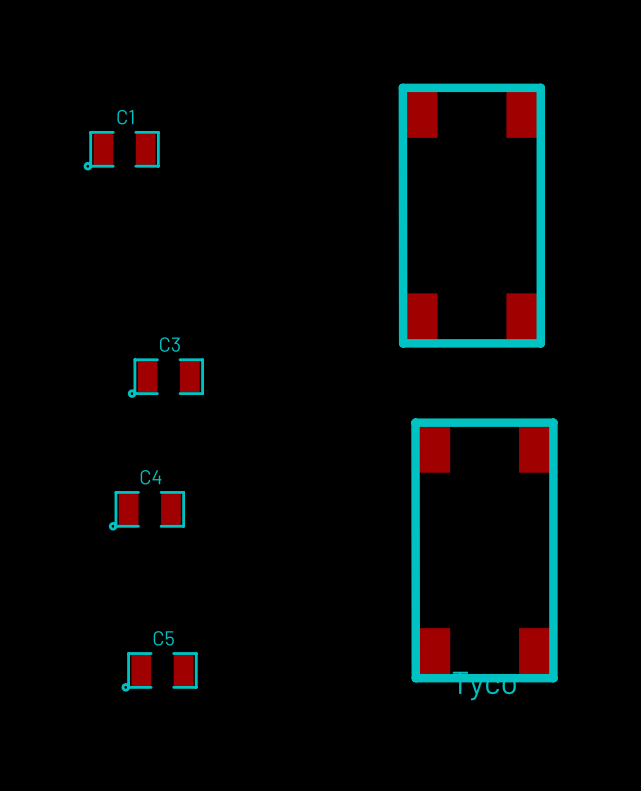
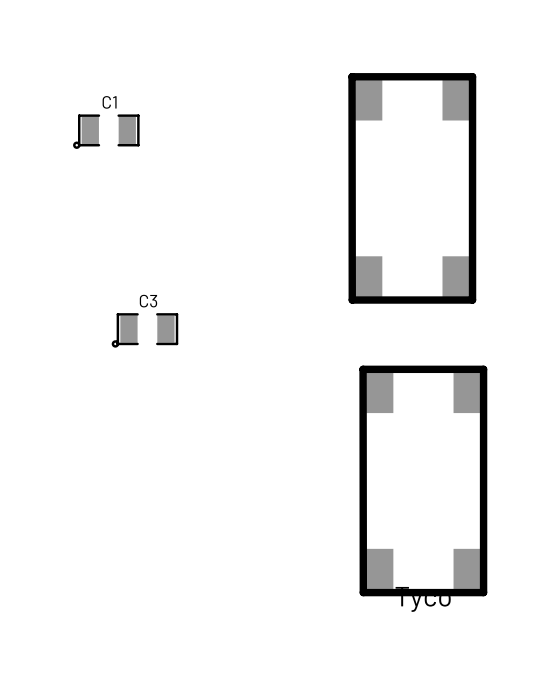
C4: (146, 510) -> none
C5: (159, 671) -> none

